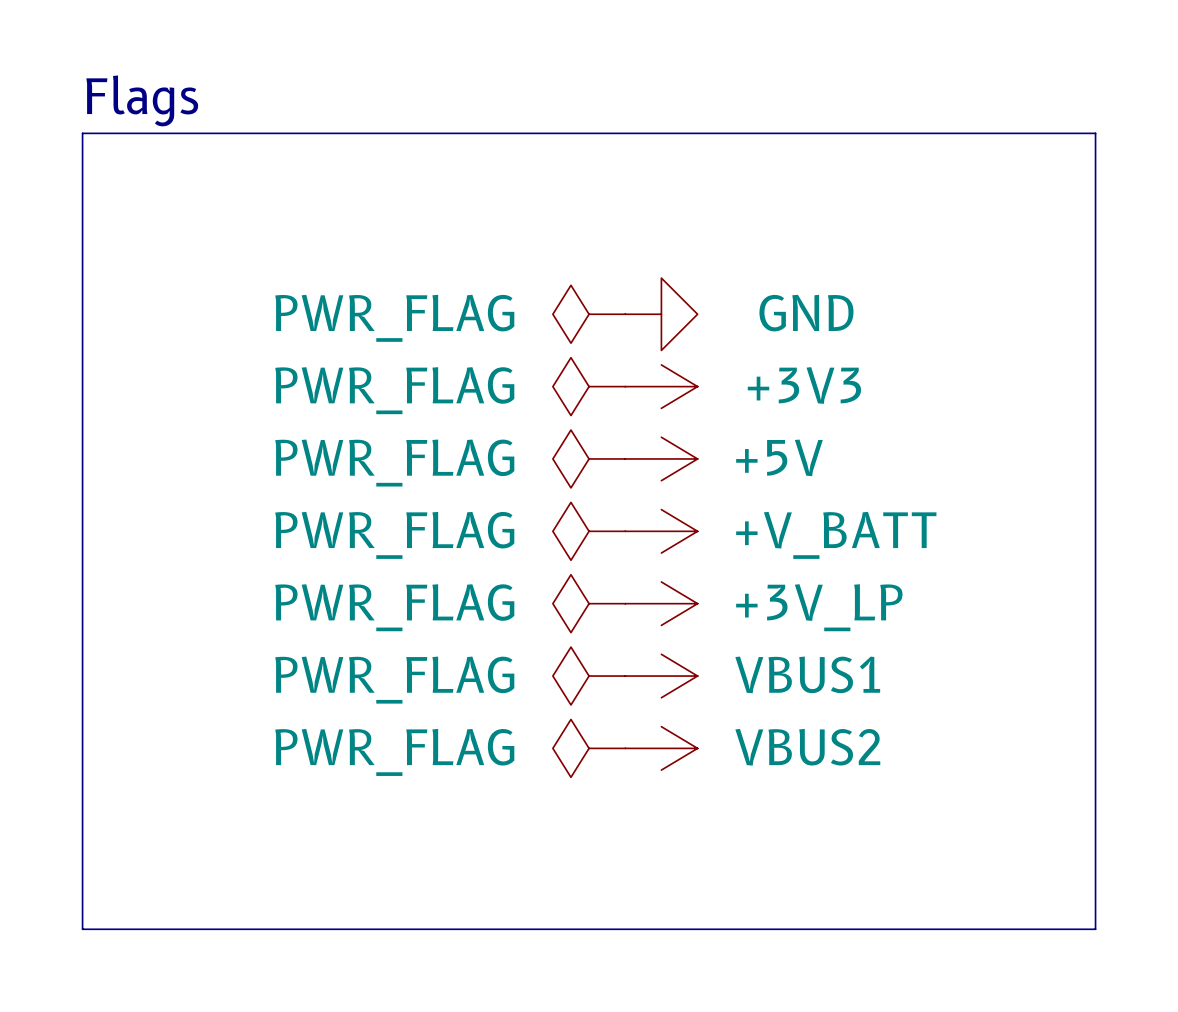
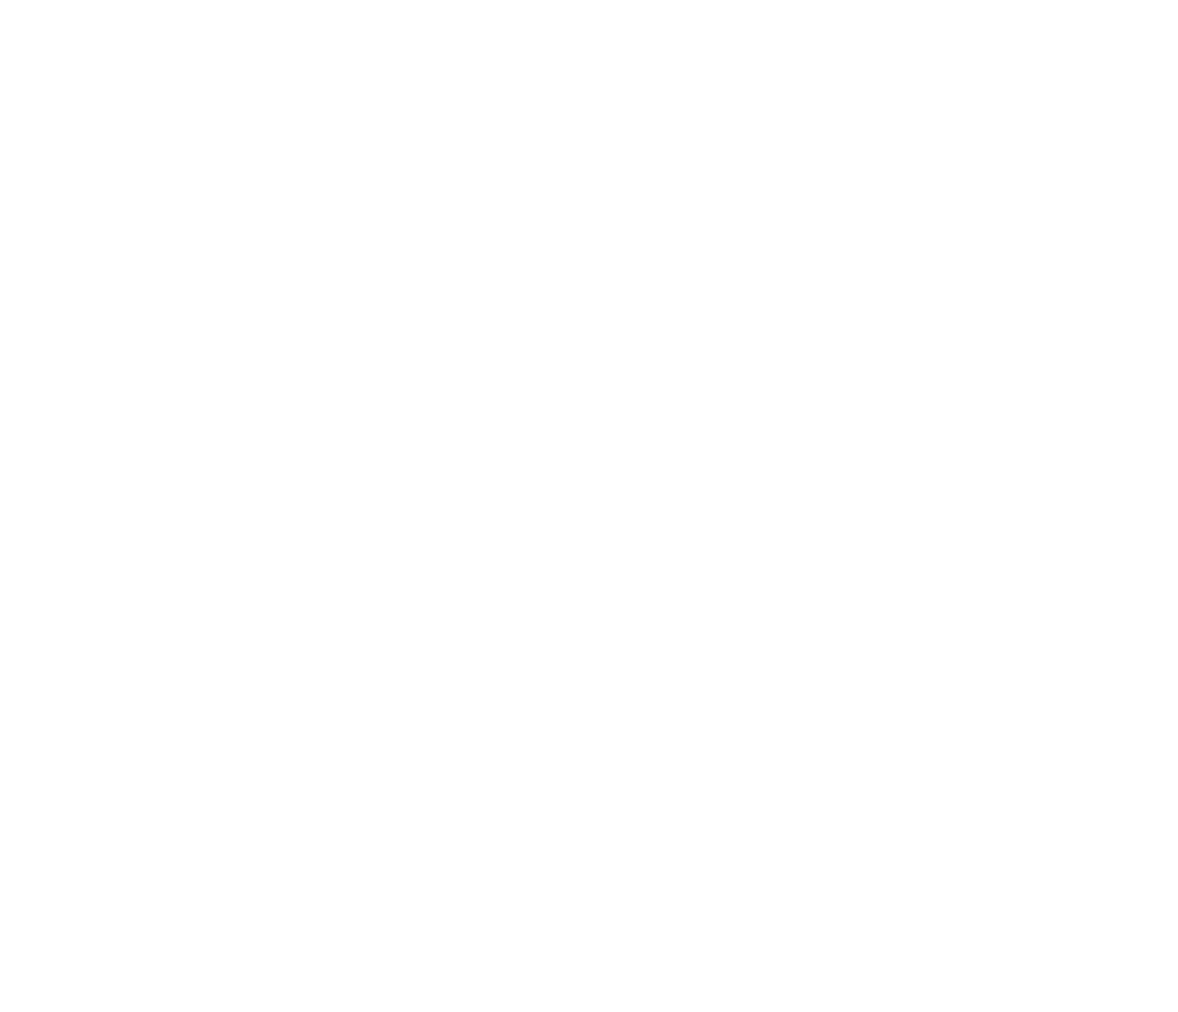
text: Flags (142, 100) -> none
line: (82, 133) (1095, 133) (1095, 929) (82, 929) (82, 133) -> none
power symbol: PWR_FLAG (589, 314) -> none
power symbol: GND (661, 314) -> none
power symbol: PWR_FLAG (589, 386) -> none
power symbol: +3V3 (661, 386) -> none
power symbol: PWR_FLAG (589, 458) -> none
power symbol: +5V (661, 458) -> none
power symbol: PWR_FLAG (589, 531) -> none
power symbol: +V_BATT (661, 531) -> none
power symbol: PWR_FLAG (589, 603) -> none
power symbol: +3V_LP (661, 603) -> none
power symbol: PWR_FLAG (589, 676) -> none
power symbol: VBUS1 (661, 676) -> none
power symbol: PWR_FLAG (589, 748) -> none
power symbol: VBUS2 (661, 748) -> none

